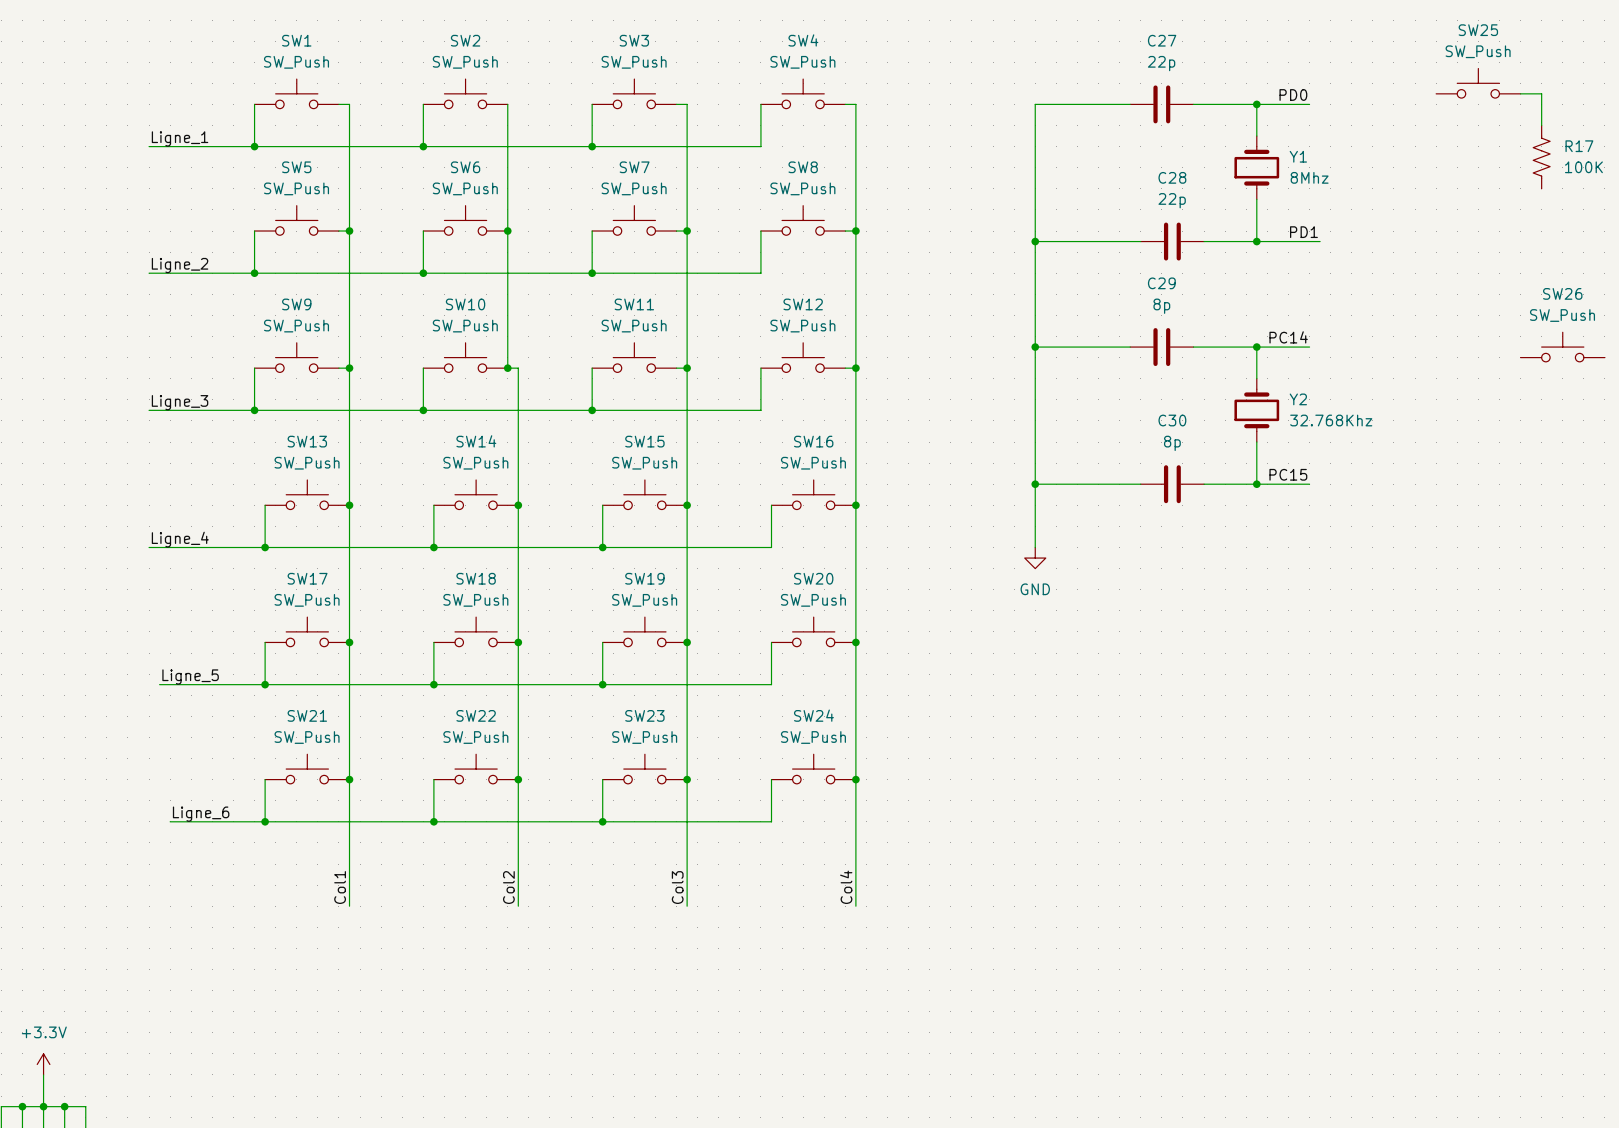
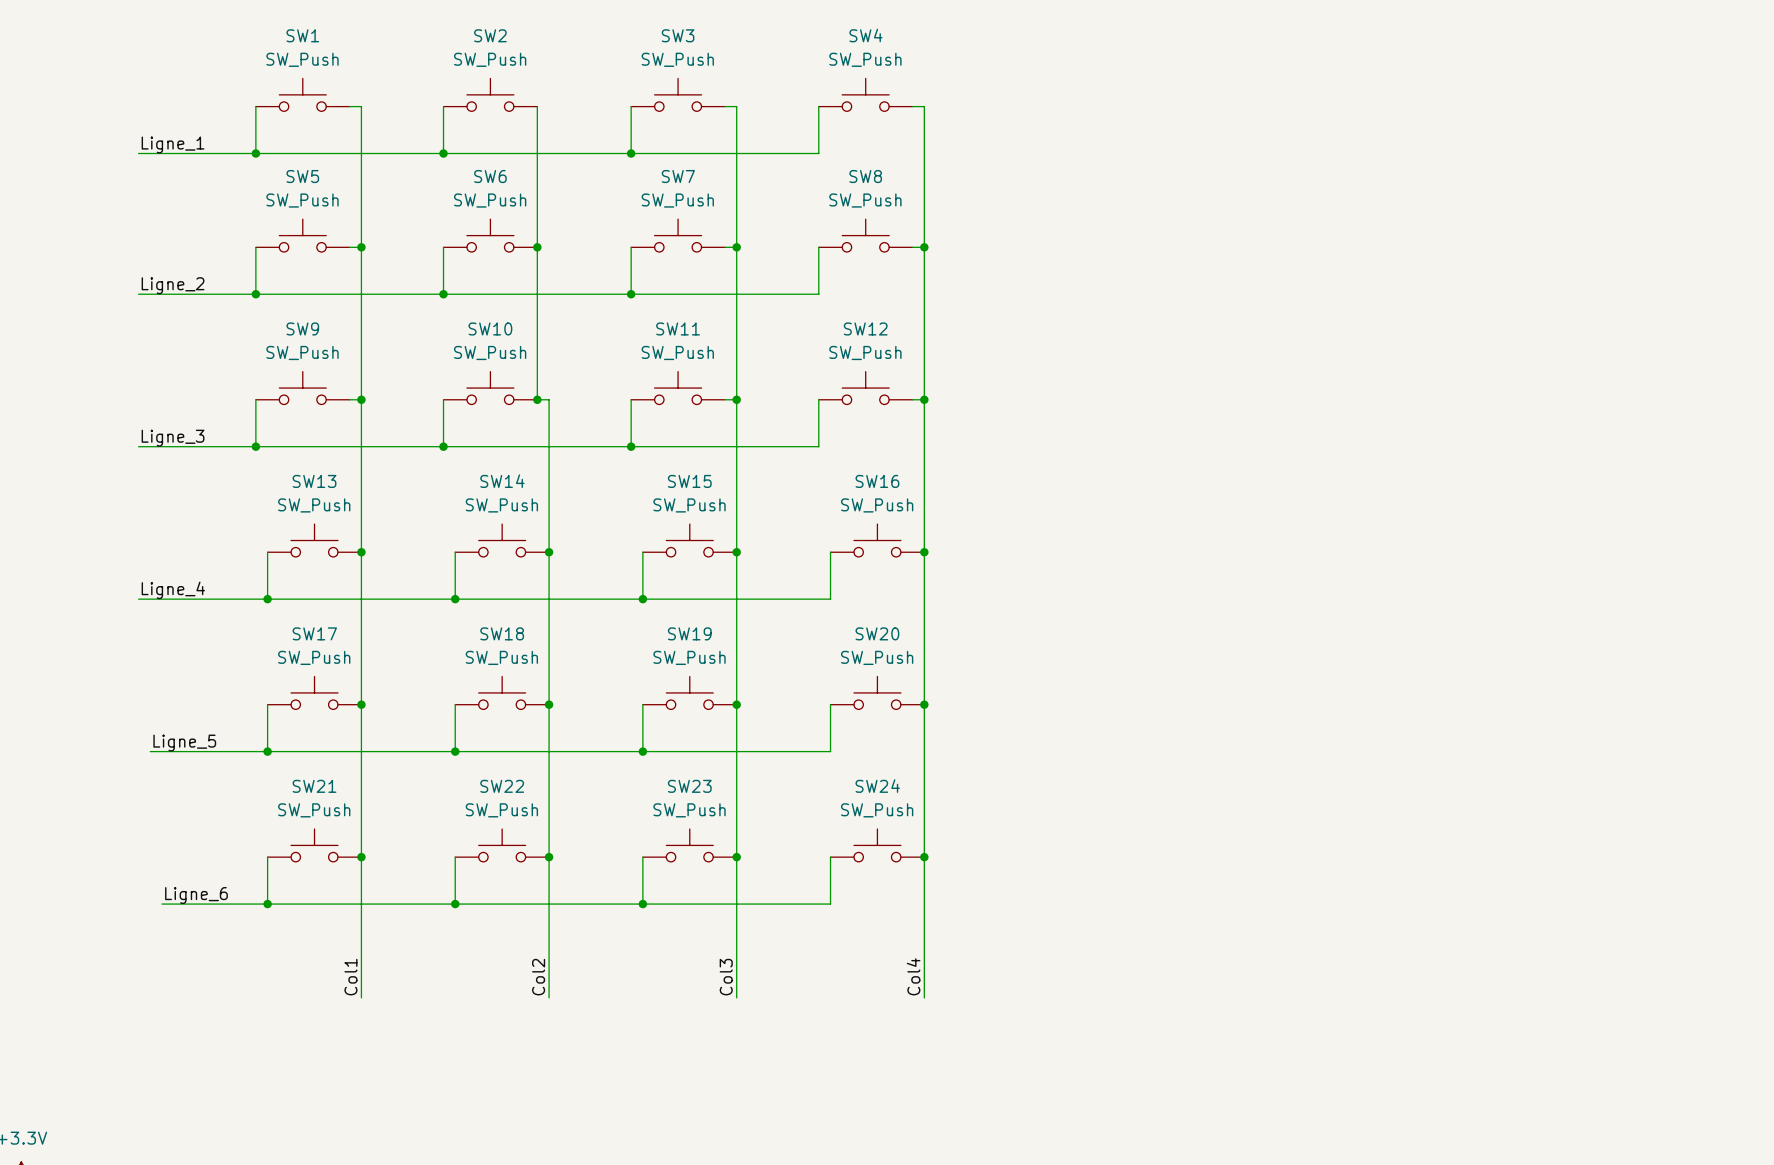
SW25: SW_Push (1478, 83) -> none
wire: (1520, 93) (1541, 93) (1541, 125) -> none
label: PD0 (1293, 94) -> none
wire: (1130, 104) (1035, 104) (1035, 547) -> none
C27: 22p (1161, 104) -> none
wire: (1193, 104) (1309, 104) -> none
wire: (1256, 104) (1256, 136) -> none
junction: (1256, 104) -> none
R17: 100K (1541, 157) -> none
Y1: 8Mhz (1256, 167) -> none
wire: (1256, 199) (1256, 241) -> none
label: PD1 (1303, 232) -> none
wire: (1035, 241) (1140, 241) -> none
junction: (1035, 241) -> none
C28: 22p (1172, 241) -> none
wire: (1204, 241) (1320, 241) -> none
junction: (1256, 241) -> none
label: PC14 (1288, 337) -> none
wire: (1035, 347) (1130, 347) -> none
junction: (1035, 347) -> none
C29: 8p (1161, 347) -> none
wire: (1193, 347) (1309, 347) -> none
wire: (1256, 347) (1256, 378) -> none
junction: (1256, 347) -> none
SW26: SW_Push (1562, 347) -> none
Y2: 32.768Khz (1256, 410) -> none
wire: (1256, 442) (1256, 484) -> none
label: PC15 (1288, 474) -> none
wire: (1035, 484) (1140, 484) -> none
junction: (1035, 484) -> none
C30: 8p (1172, 484) -> none
wire: (1204, 484) (1309, 484) -> none
junction: (1256, 484) -> none
power symbol: GND (1035, 558) -> none

